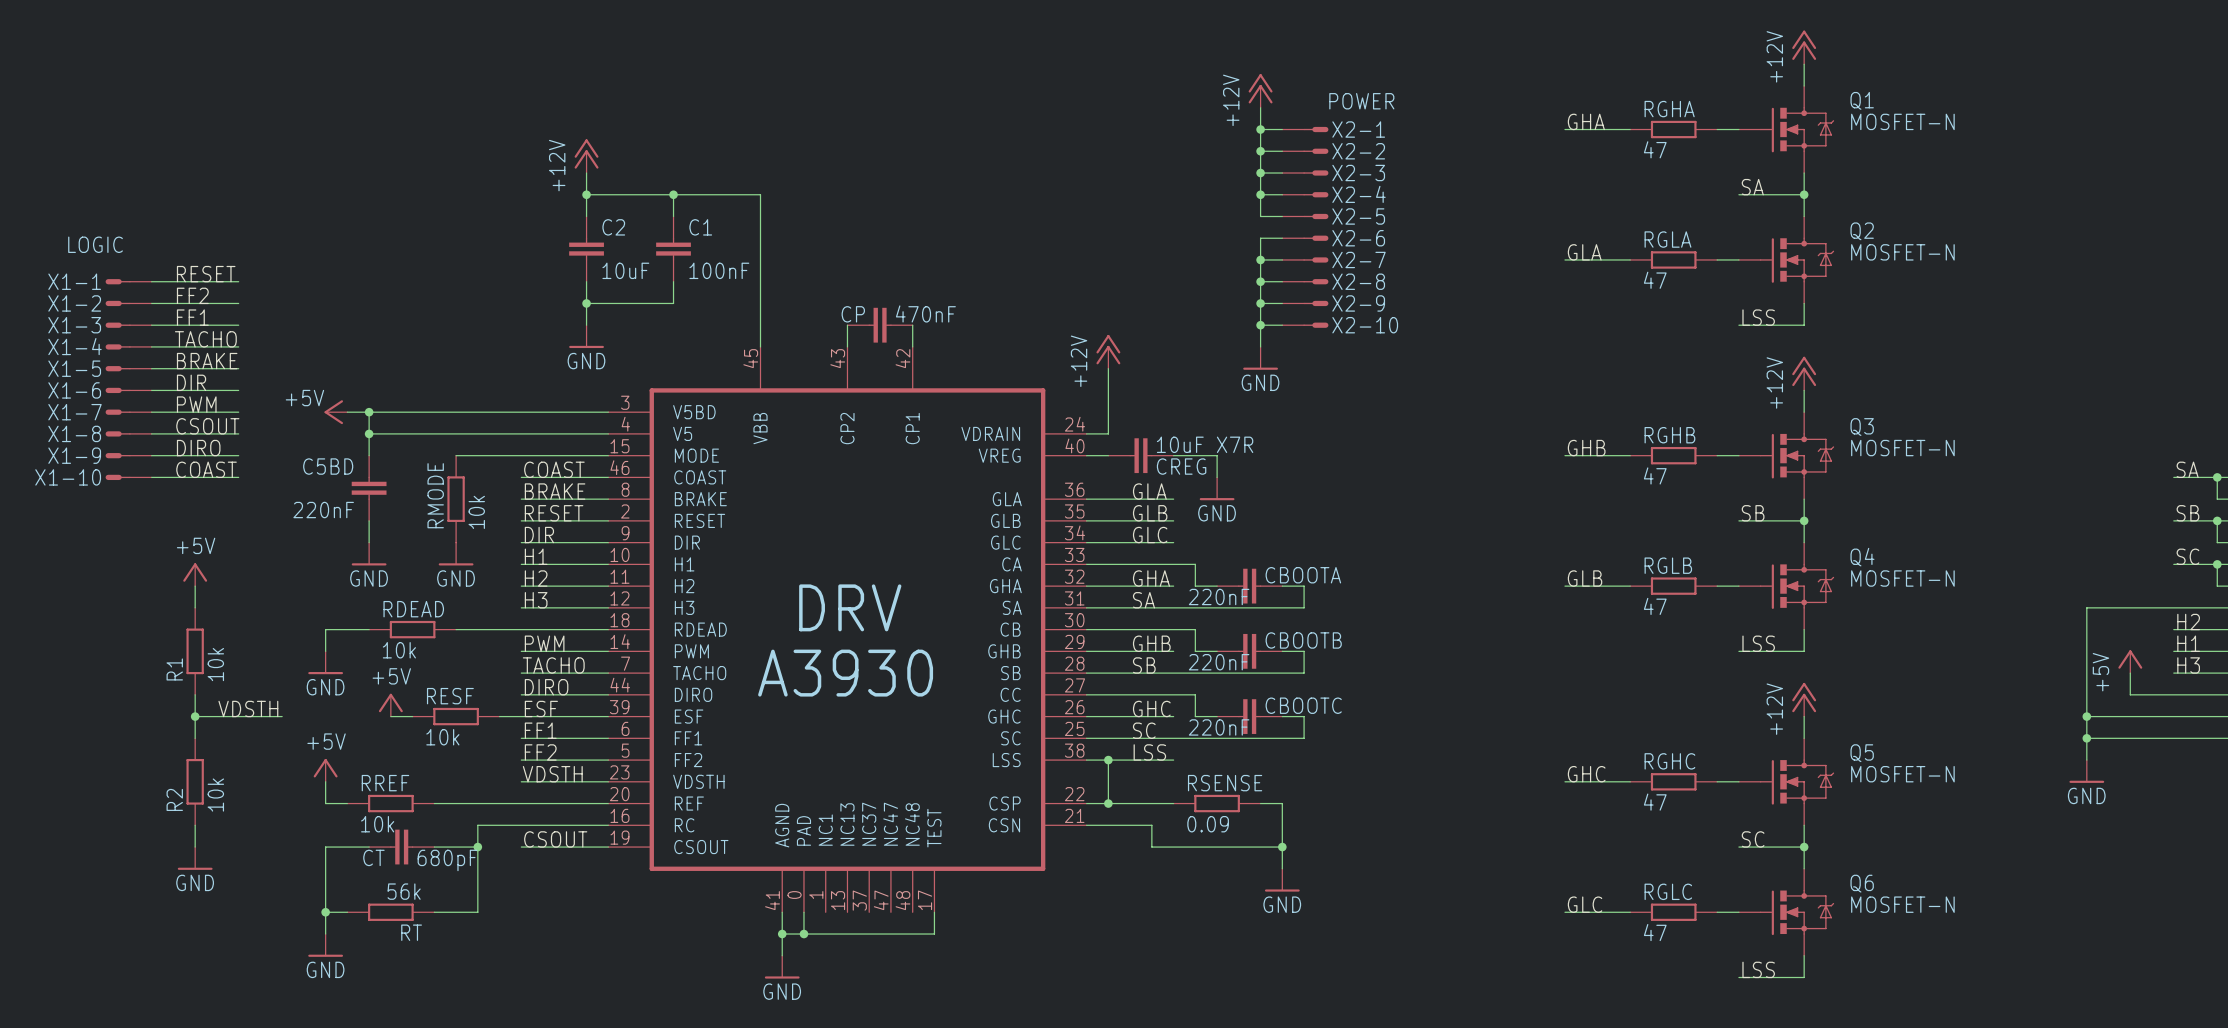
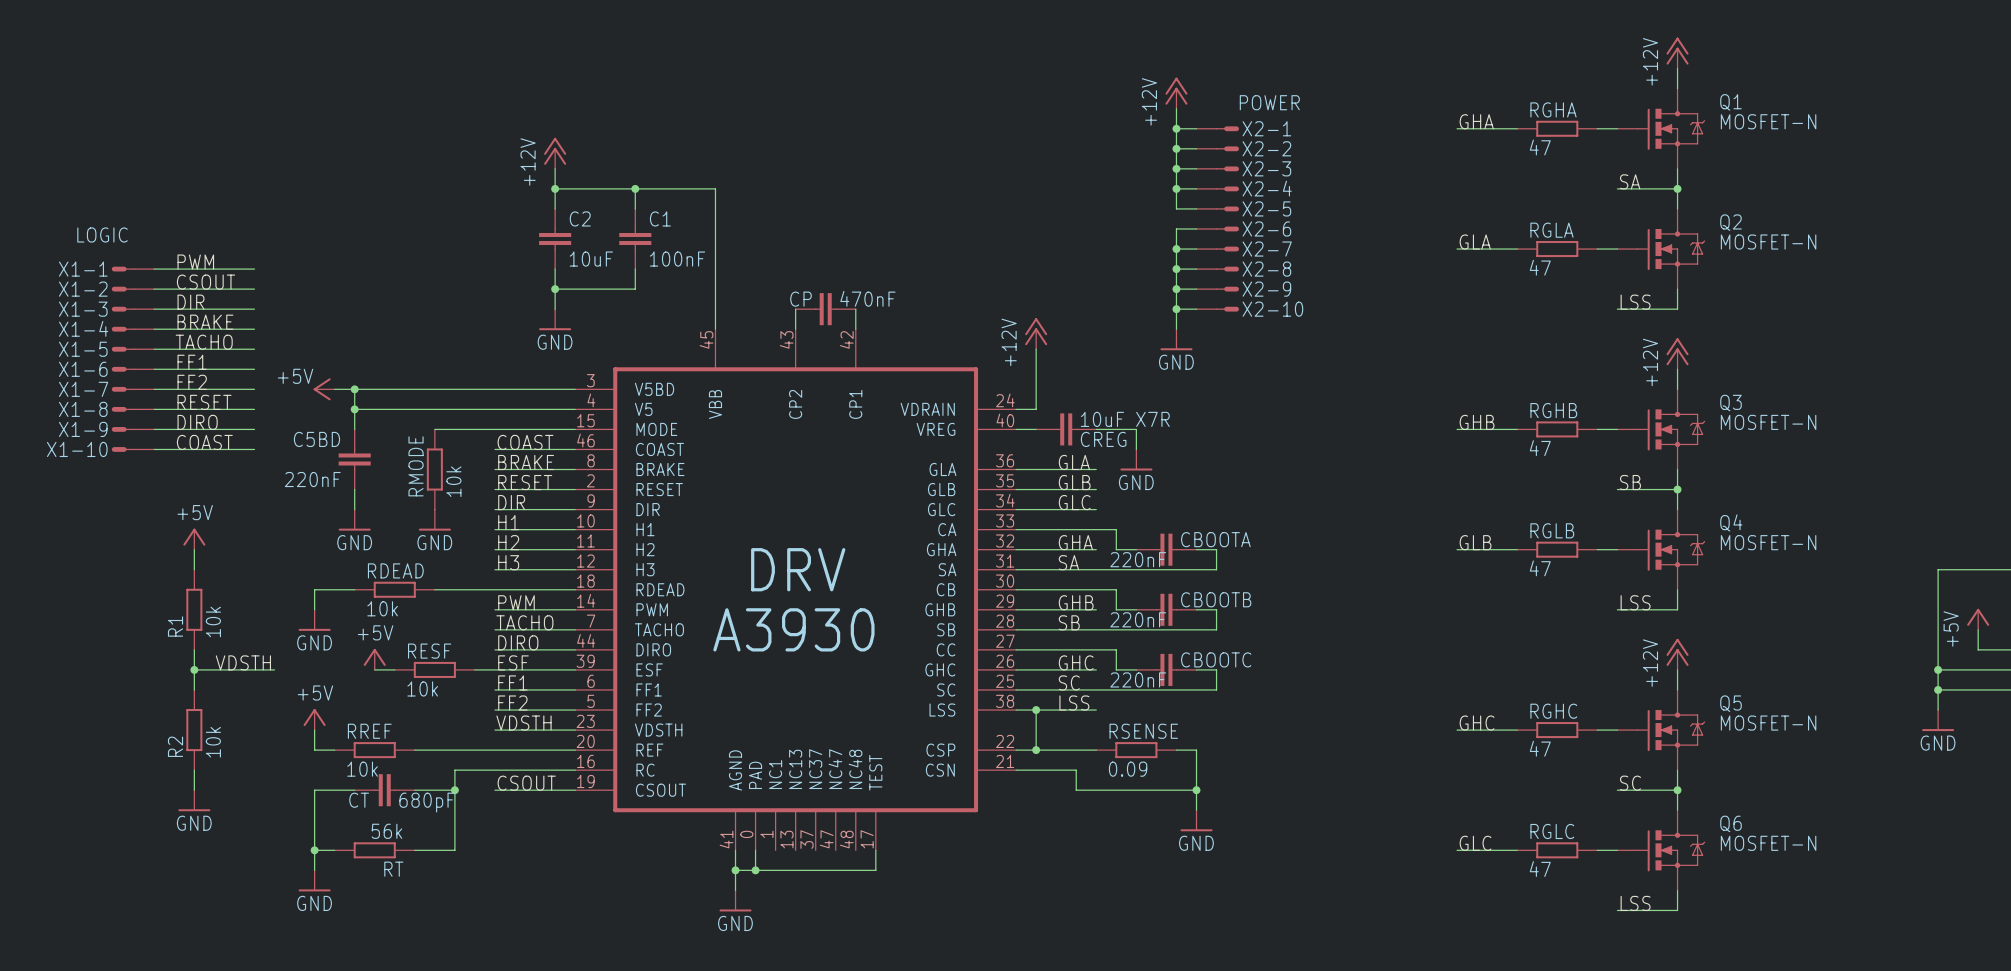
label: RESET (206, 274) -> PWM (195, 262)
wire: none -> (234, 269) (254, 269)
label: FF2 (192, 295) -> CSOUT (206, 282)
wire: none -> (234, 289) (254, 289)
label: FF1 (192, 317) -> DIR (190, 302)
wire: none -> (234, 309) (254, 309)
label: TACHO (205, 339) -> BRAKE (205, 322)
wire: none -> (234, 329) (254, 329)
label: BRAKE (207, 361) -> TACHO (204, 342)
wire: none -> (234, 349) (254, 349)
label: DIR (191, 382) -> FF1 (192, 362)
wire: none -> (234, 369) (254, 369)
label: PWM (196, 404) -> FF2 (192, 382)
wire: none -> (234, 389) (254, 389)
label: CSOUT (207, 426) -> RESET (204, 402)
wire: none -> (234, 409) (254, 409)
wire: none -> (234, 429) (254, 429)
wire: none -> (234, 449) (254, 449)

